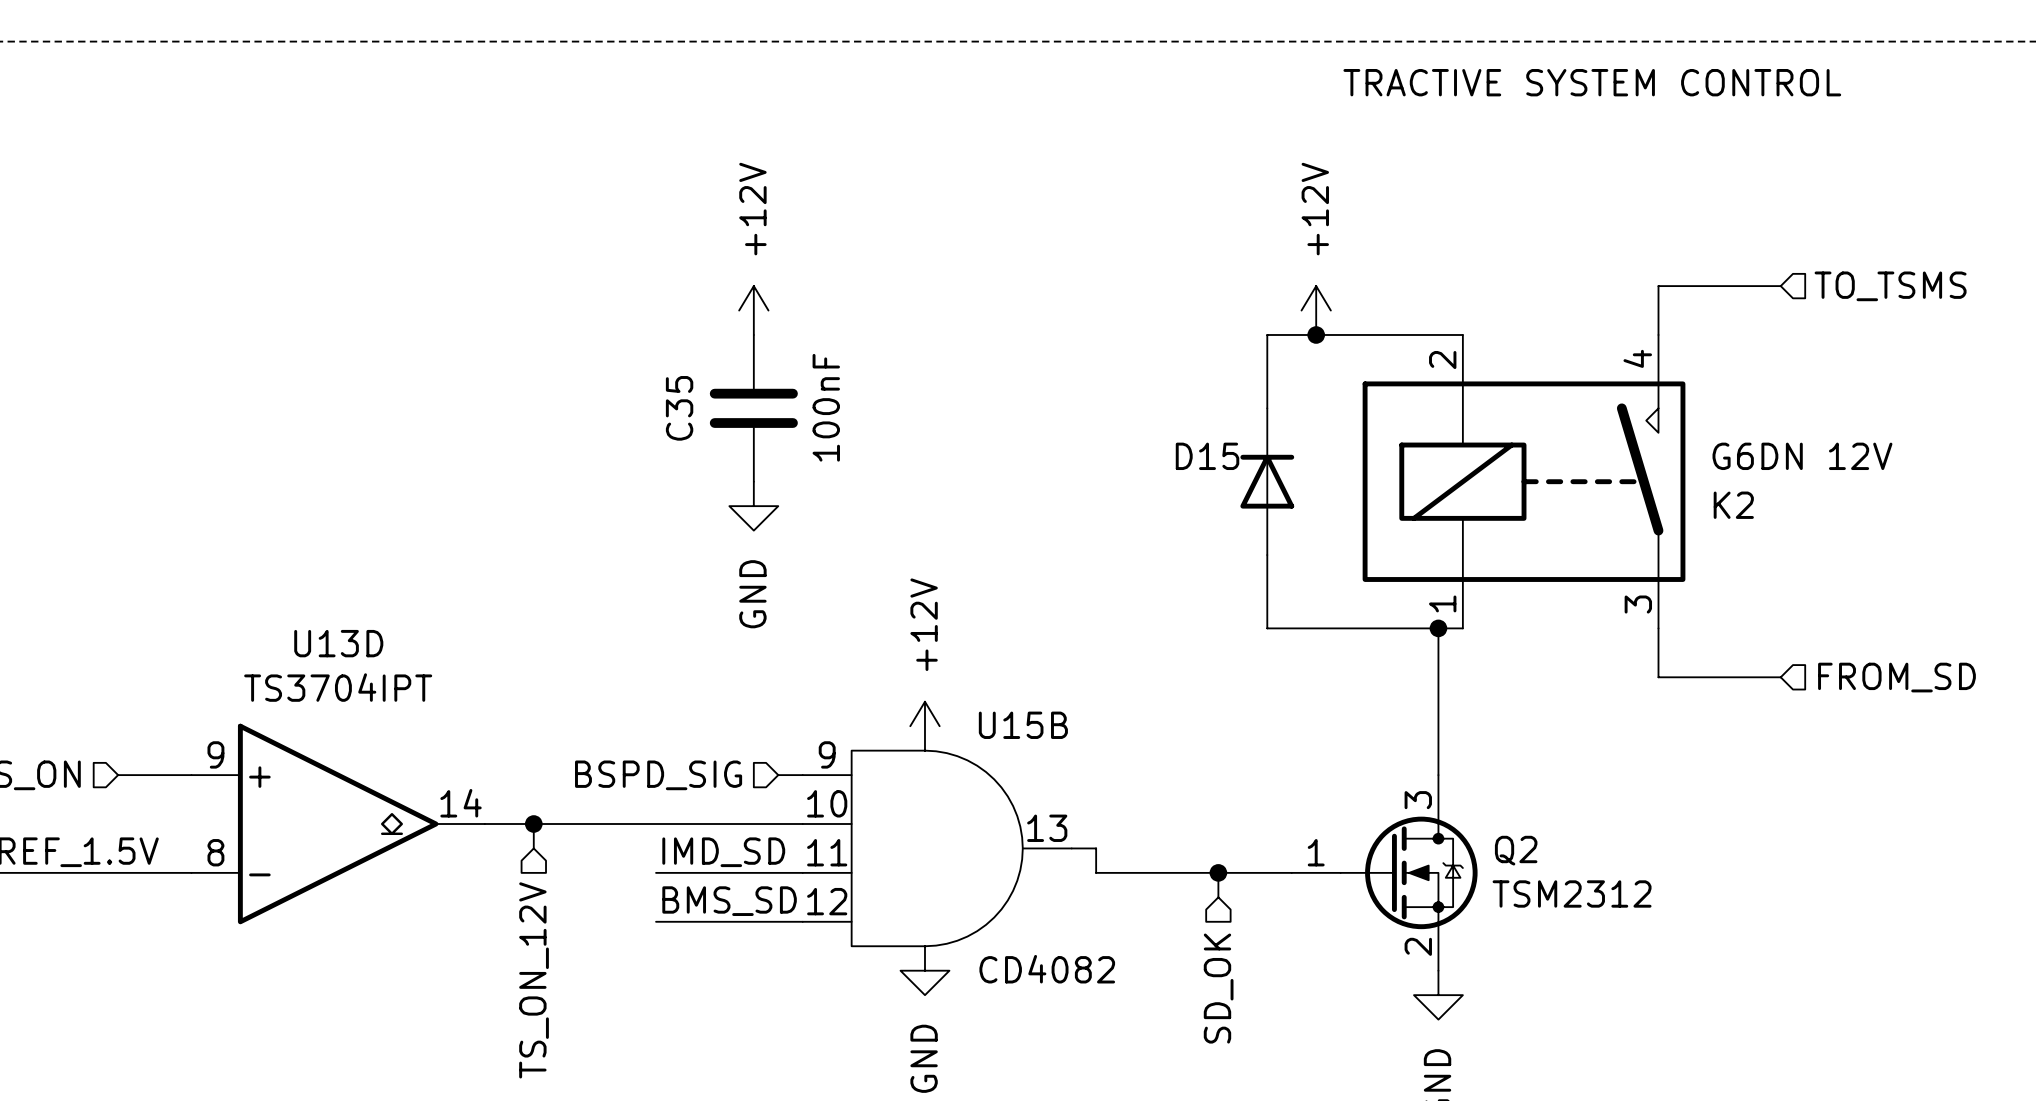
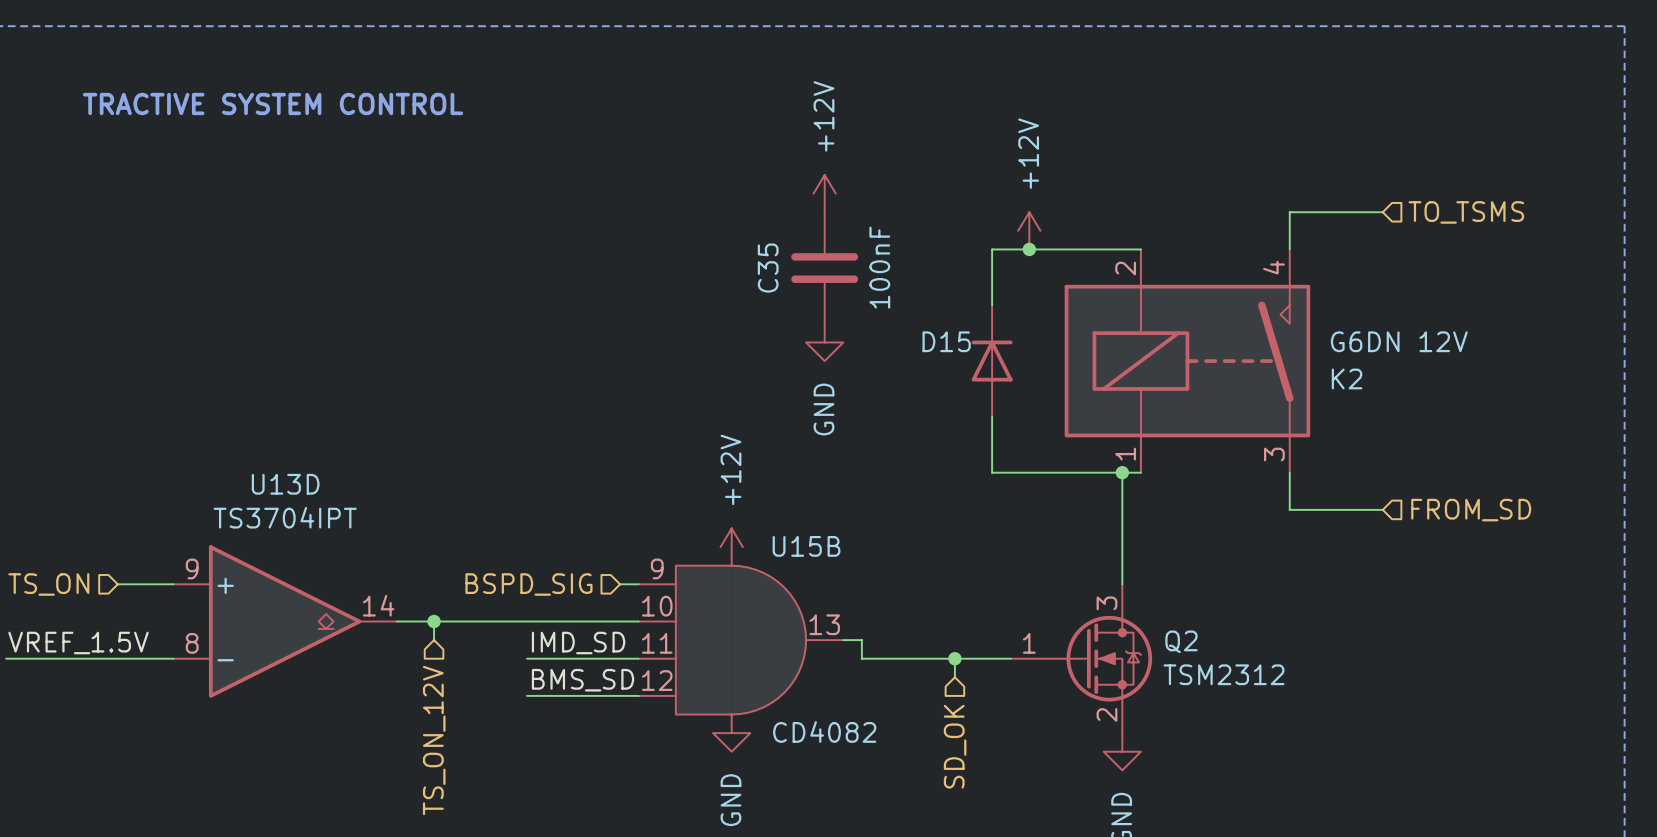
text: TRACTIVE SYSTEM CONTROL (1592, 82) -> none
text: none -> TRACTIVE SYSTEM CONTROL (273, 103)
power symbol position: +12V (753, 310) -> +12V (824, 193)
C35 position: (753, 408) -> (824, 268)
power symbol position: GND (753, 506) -> GND (824, 342)

